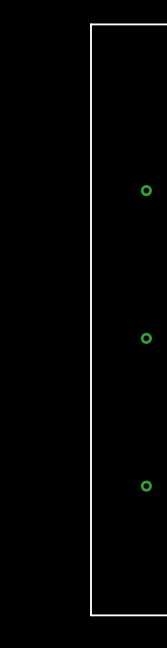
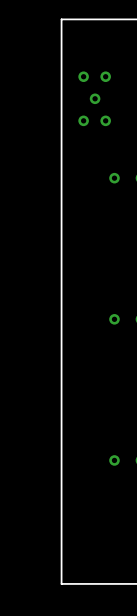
via: none -> (83, 76)
via: none -> (105, 76)
via: none -> (95, 98)
via: none -> (83, 120)
via: none -> (105, 120)

